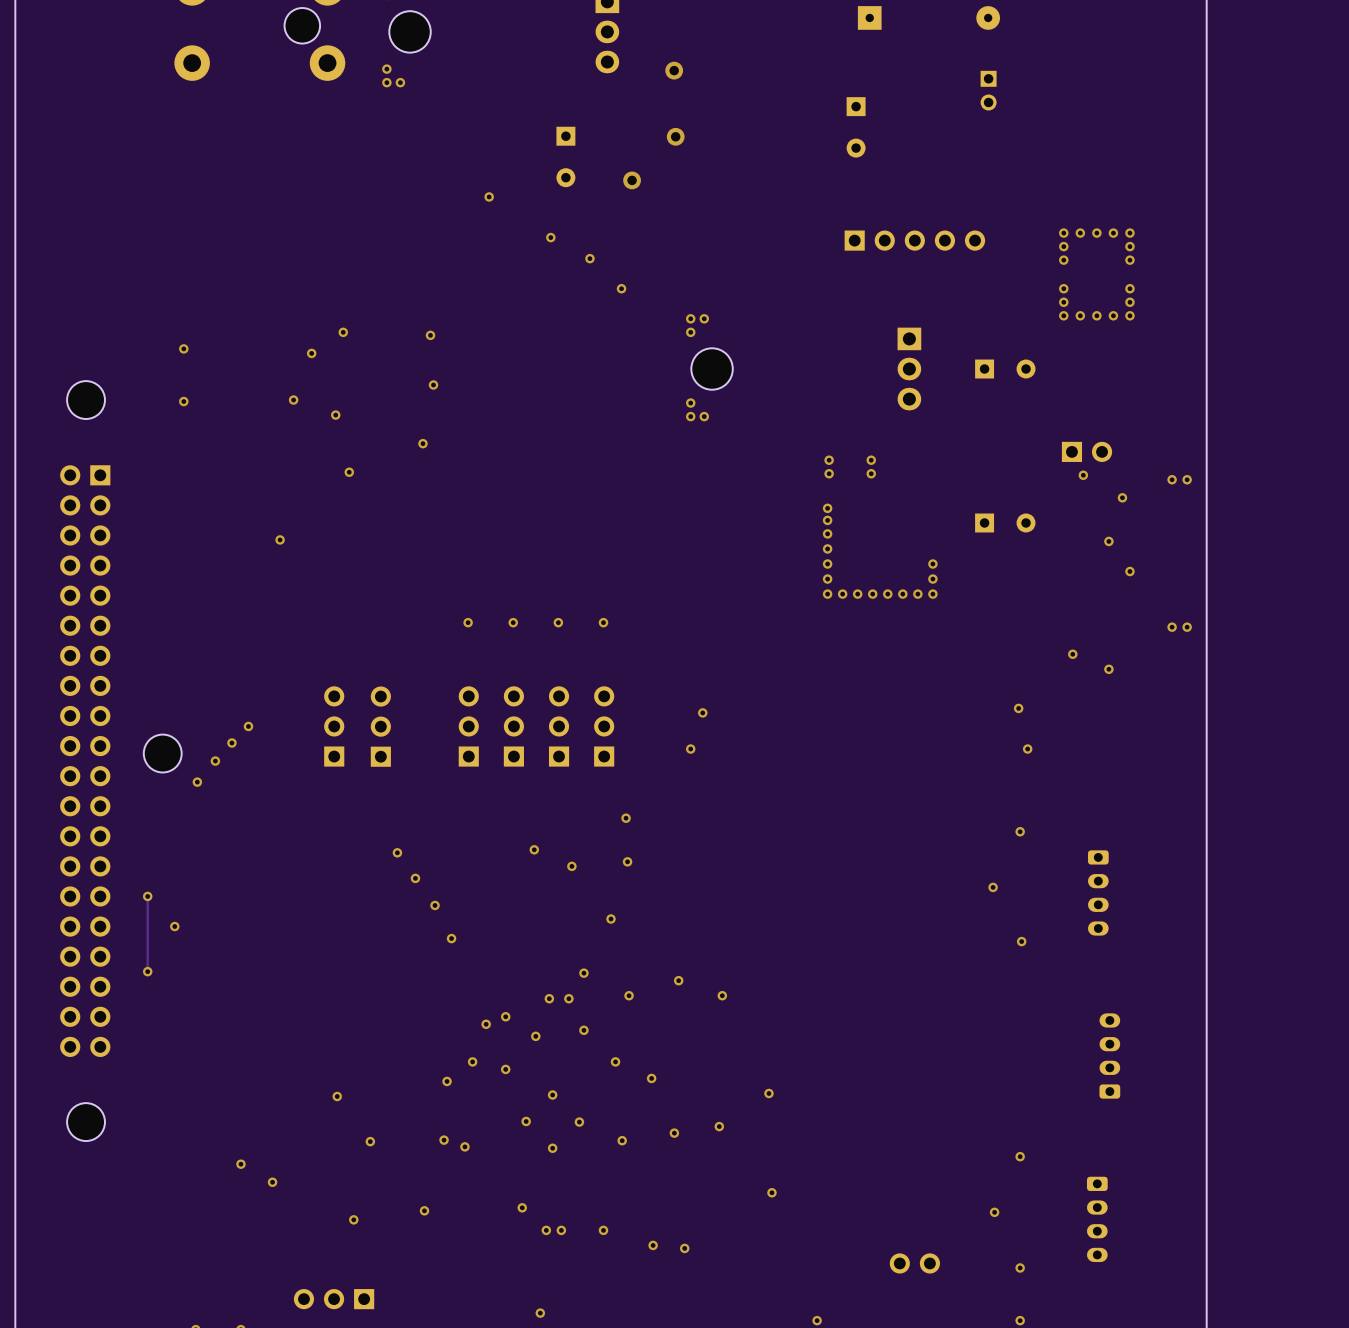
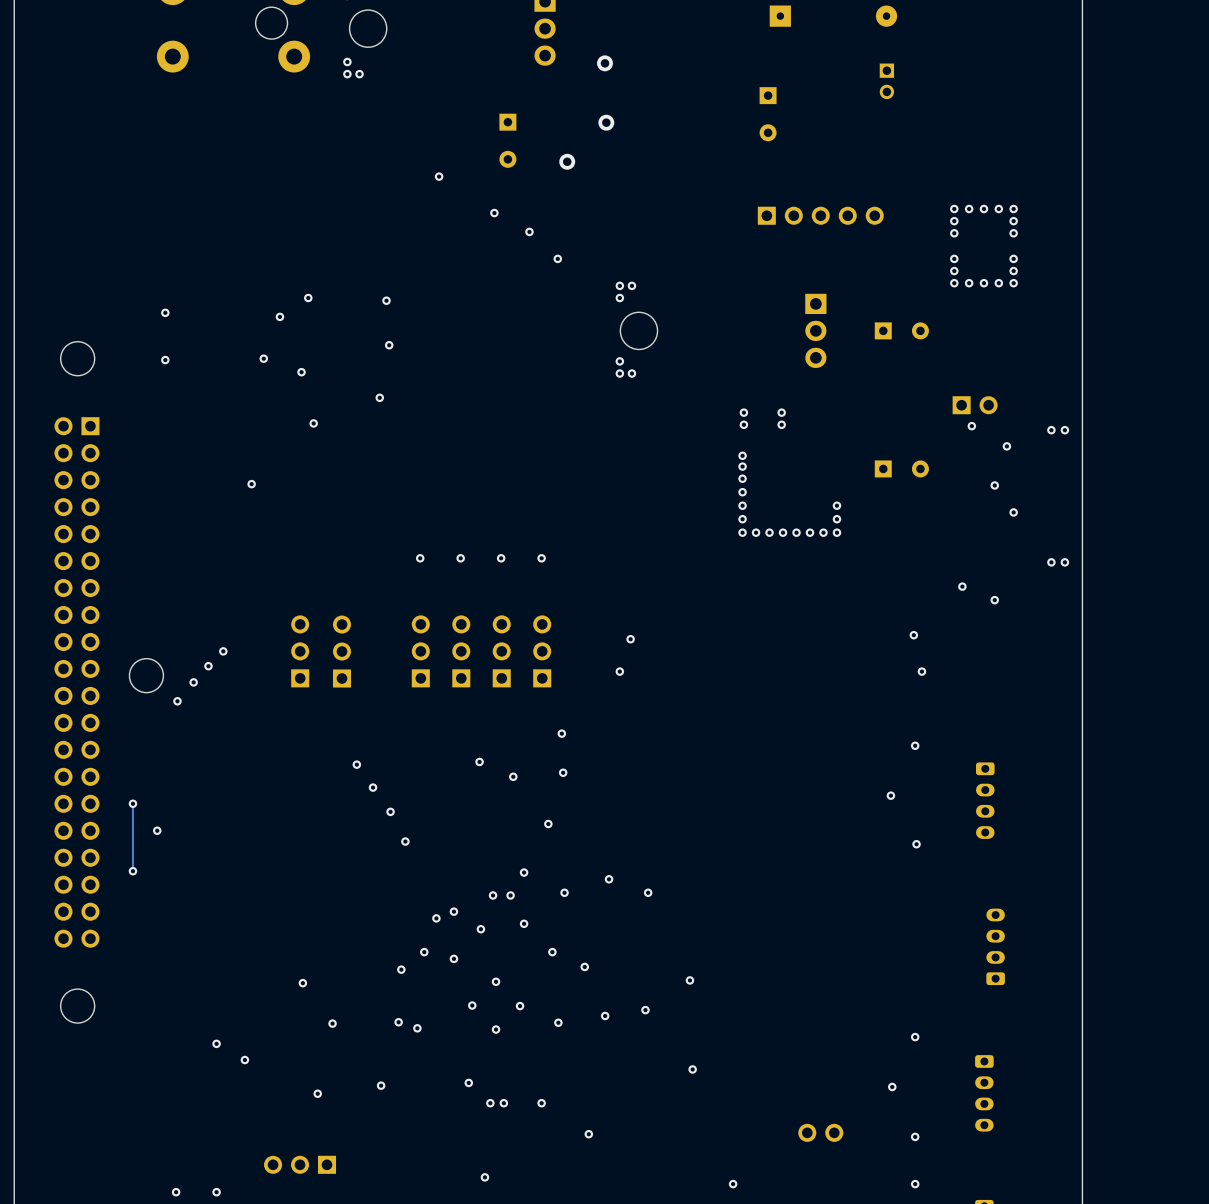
via: (653, 1245) -> none
via: (684, 1248) -> none
via: none -> (588, 1134)

